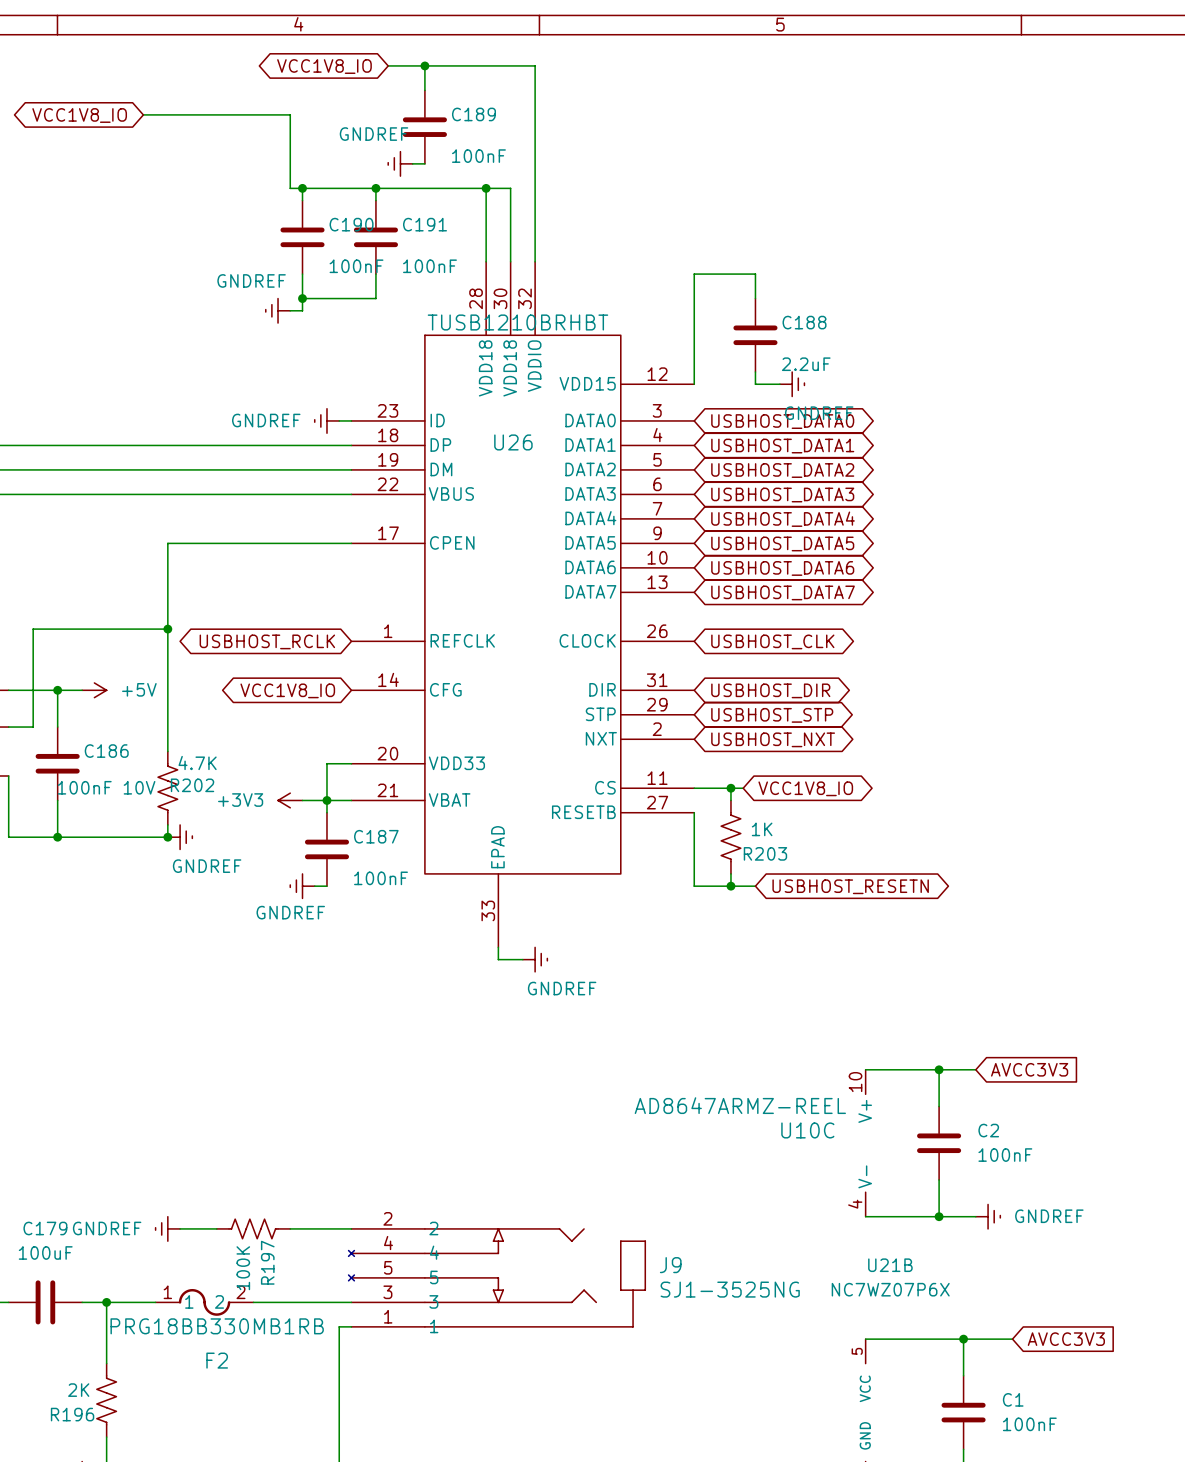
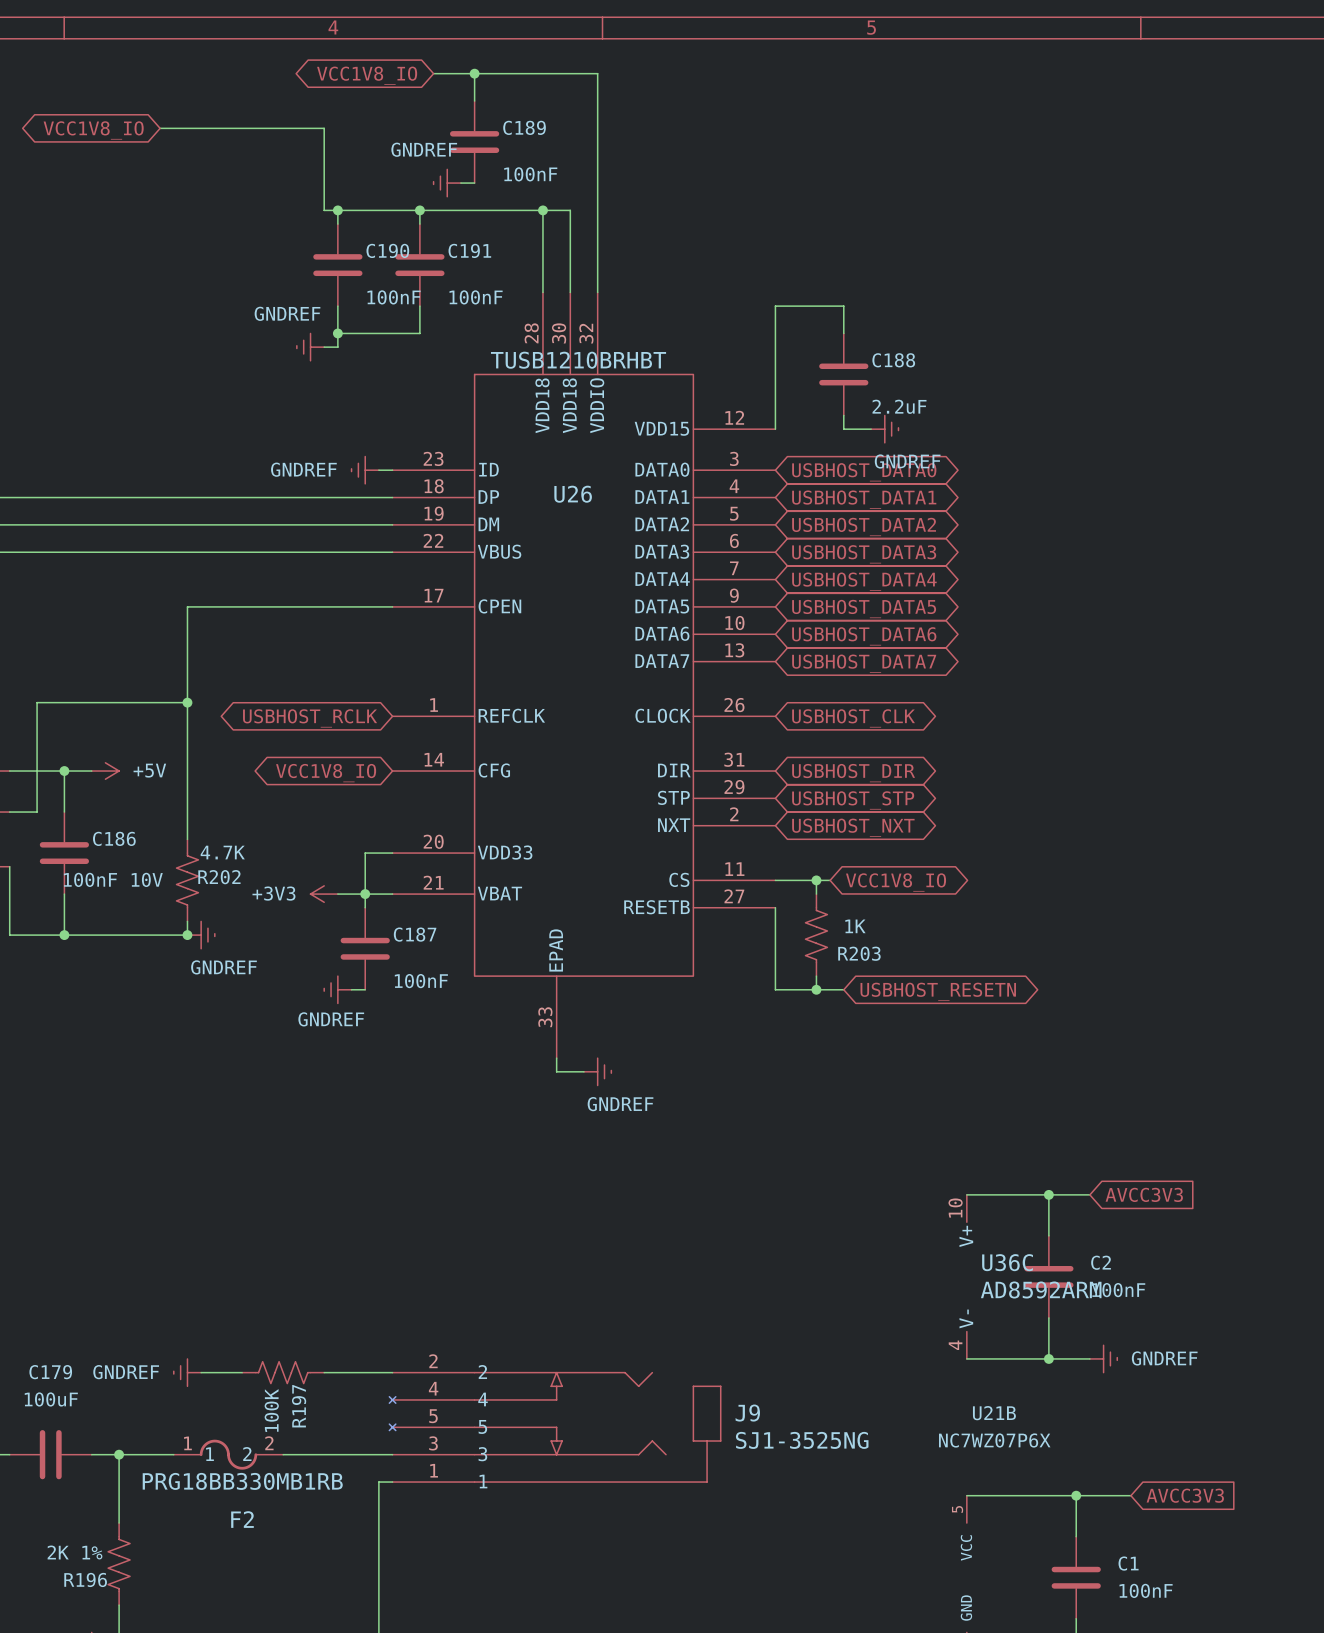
U10C value: AD8647ARMZ-REEL (740, 1105) -> AD8592ARM (1041, 1289)
U10C name: U10C (807, 1130) -> U36C (1007, 1262)
R196 value: 2K (78, 1390) -> 2K 1% (75, 1552)

